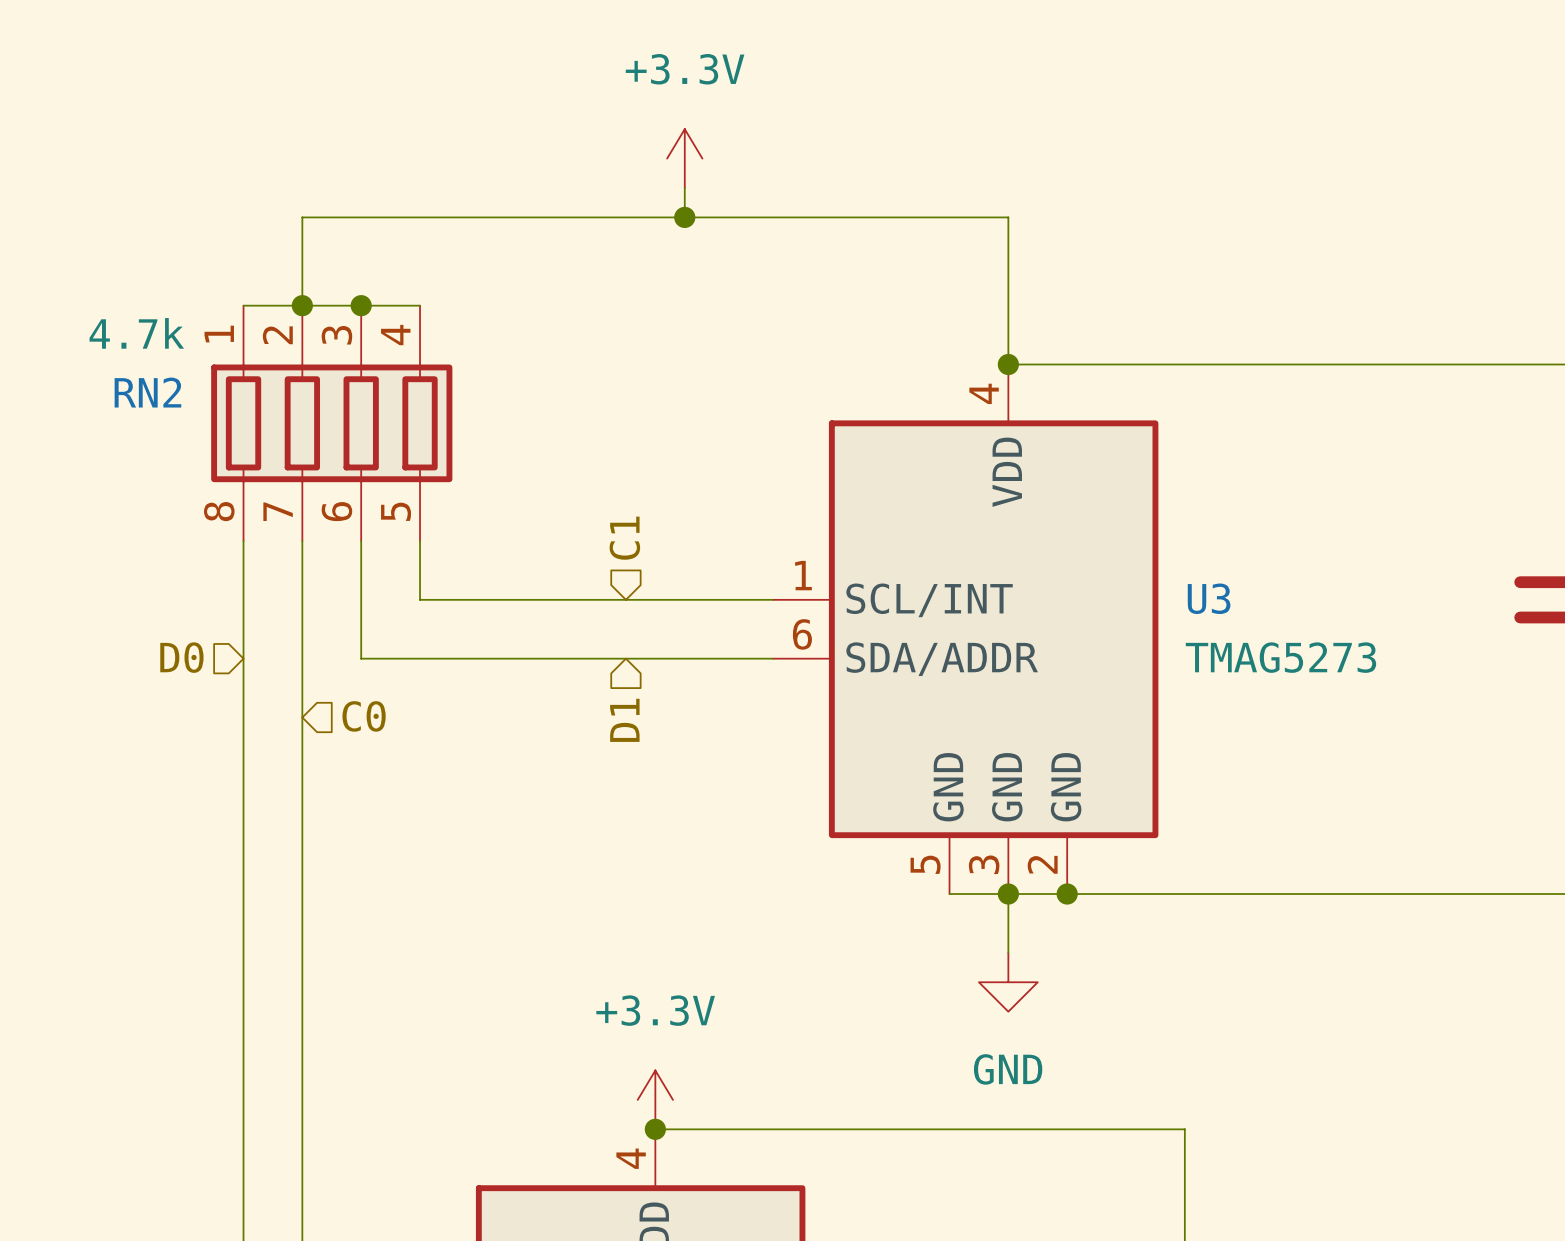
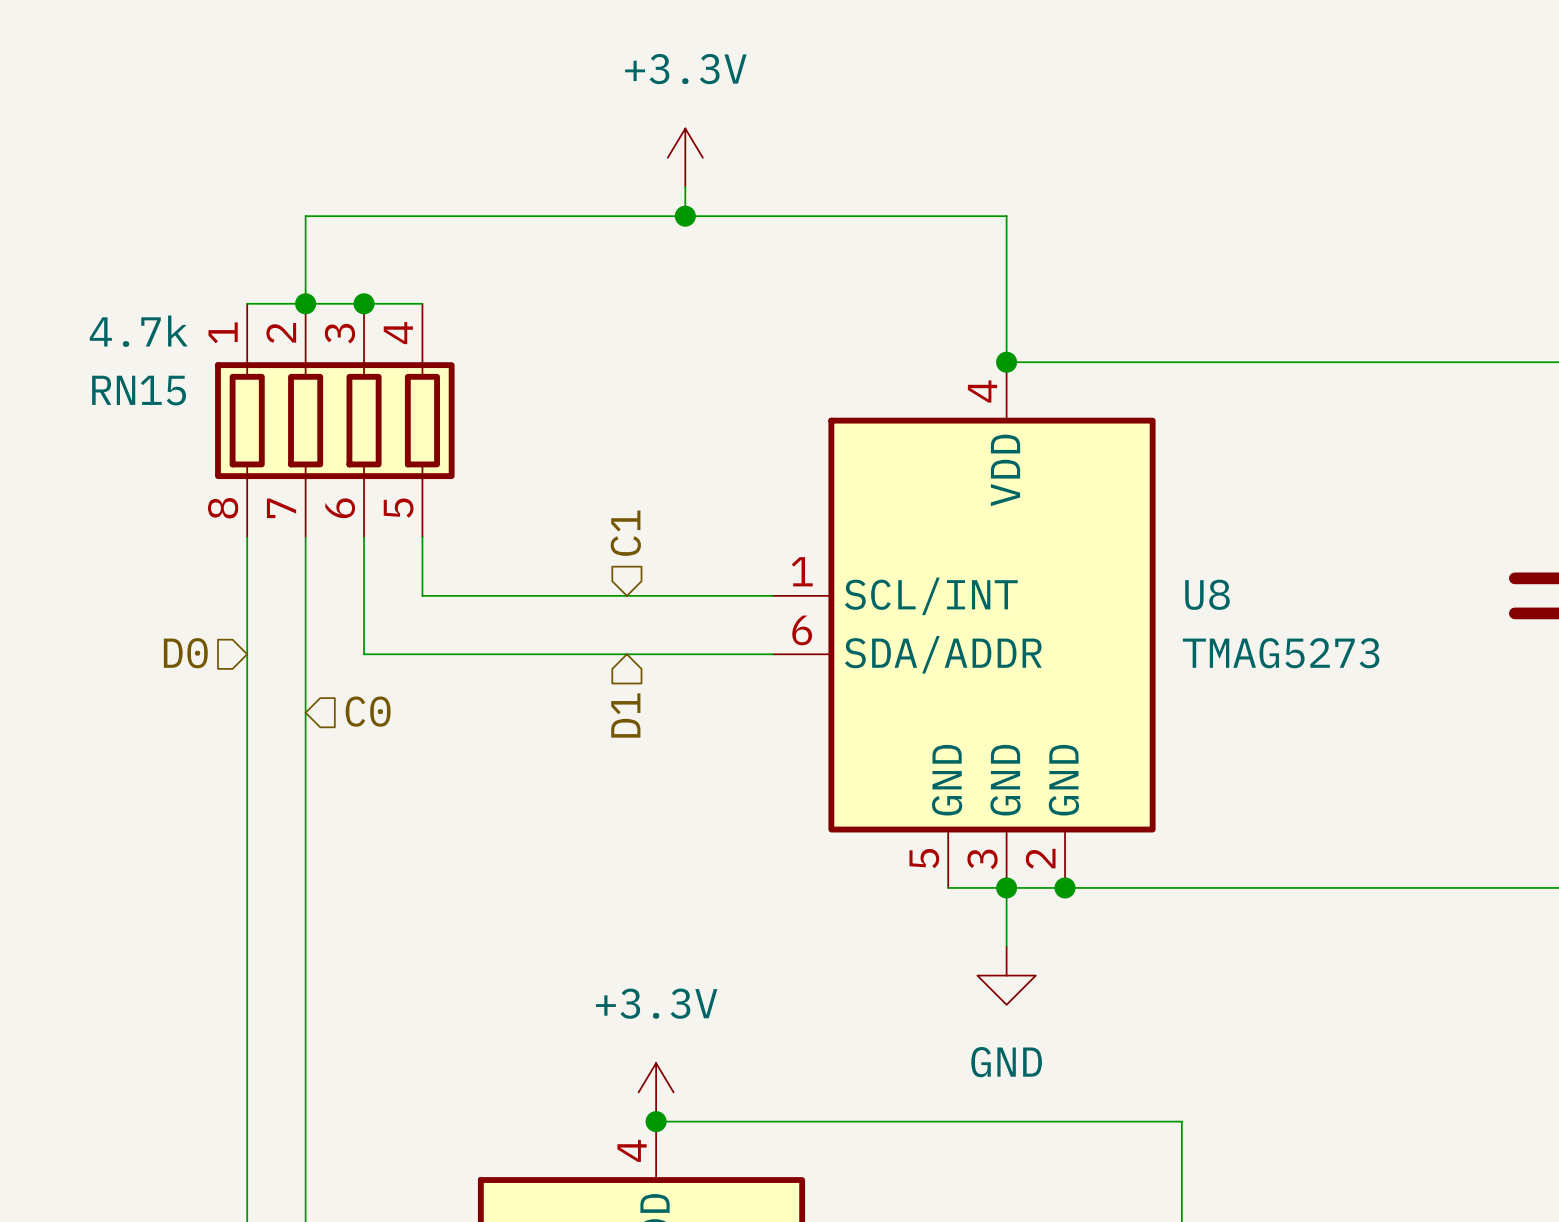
RN2 name: RN2 (147, 392) -> RN15 (139, 390)
U3 name: U3 (1209, 598) -> U8 (1207, 594)

